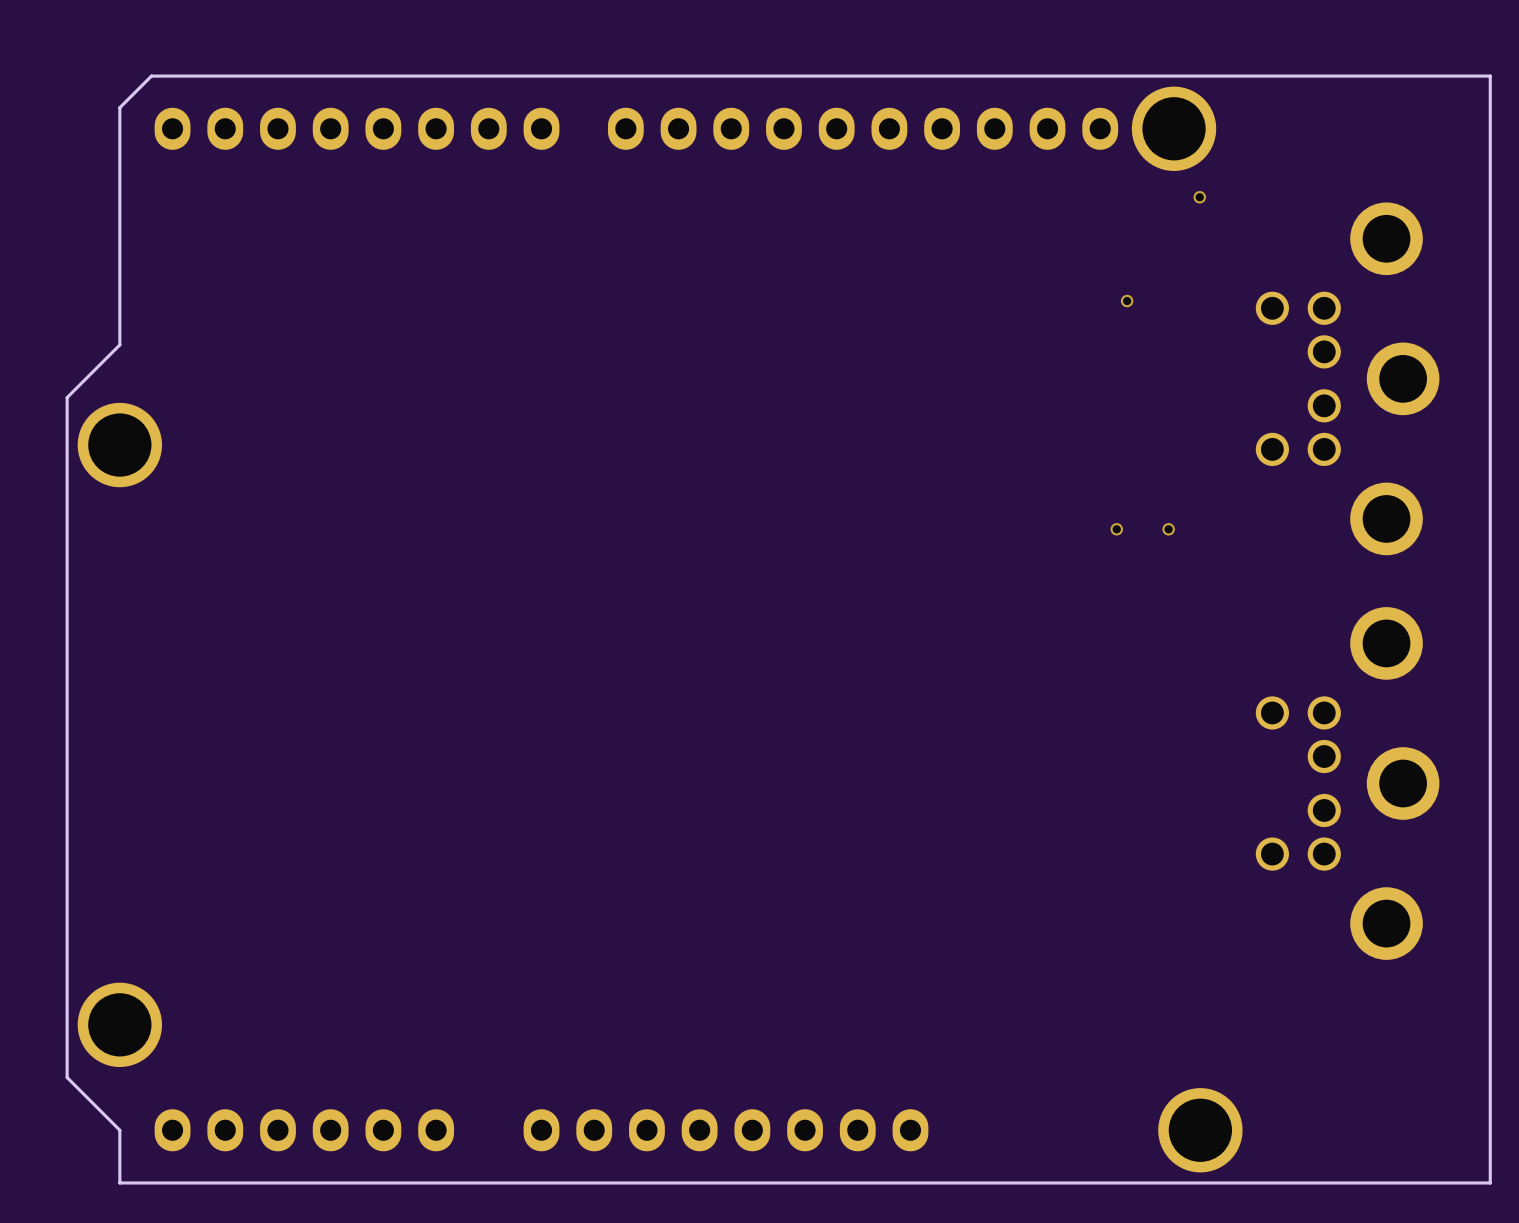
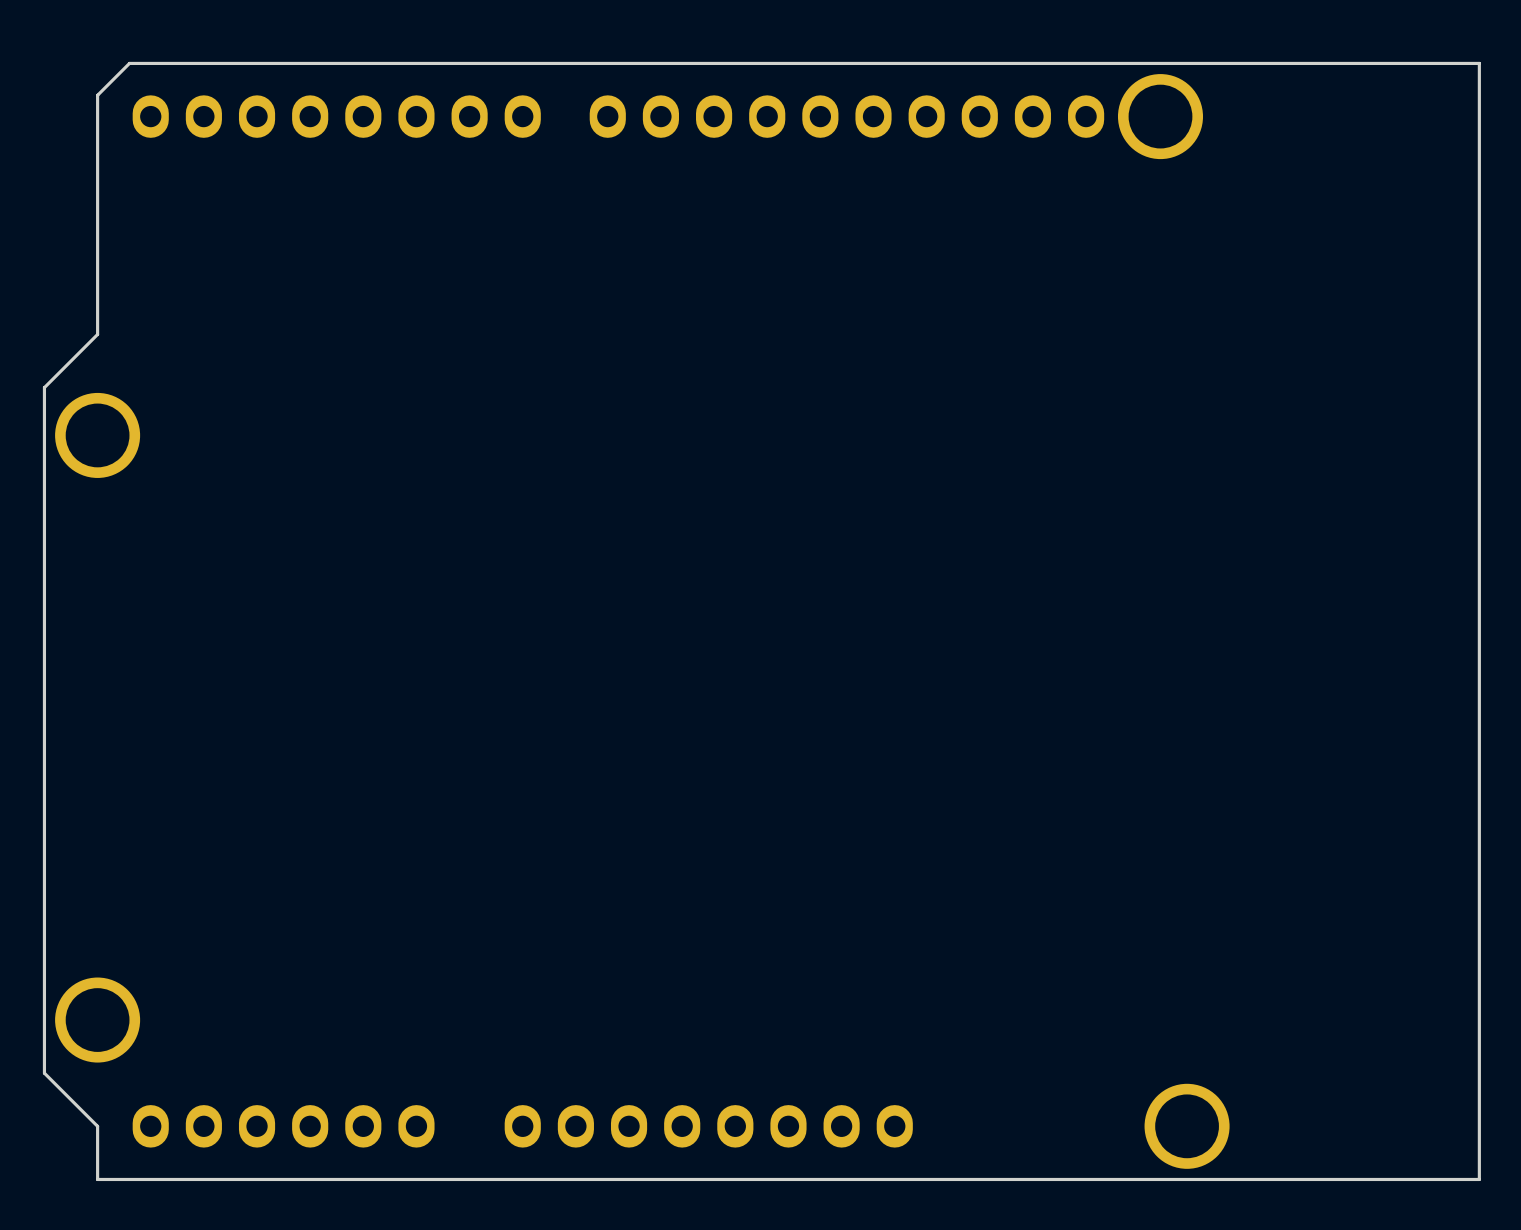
via: (1199, 197) -> none
via: (1127, 301) -> none
part: (1347, 378) -> none
via: (1116, 529) -> none
via: (1168, 529) -> none
part: (1347, 783) -> none

